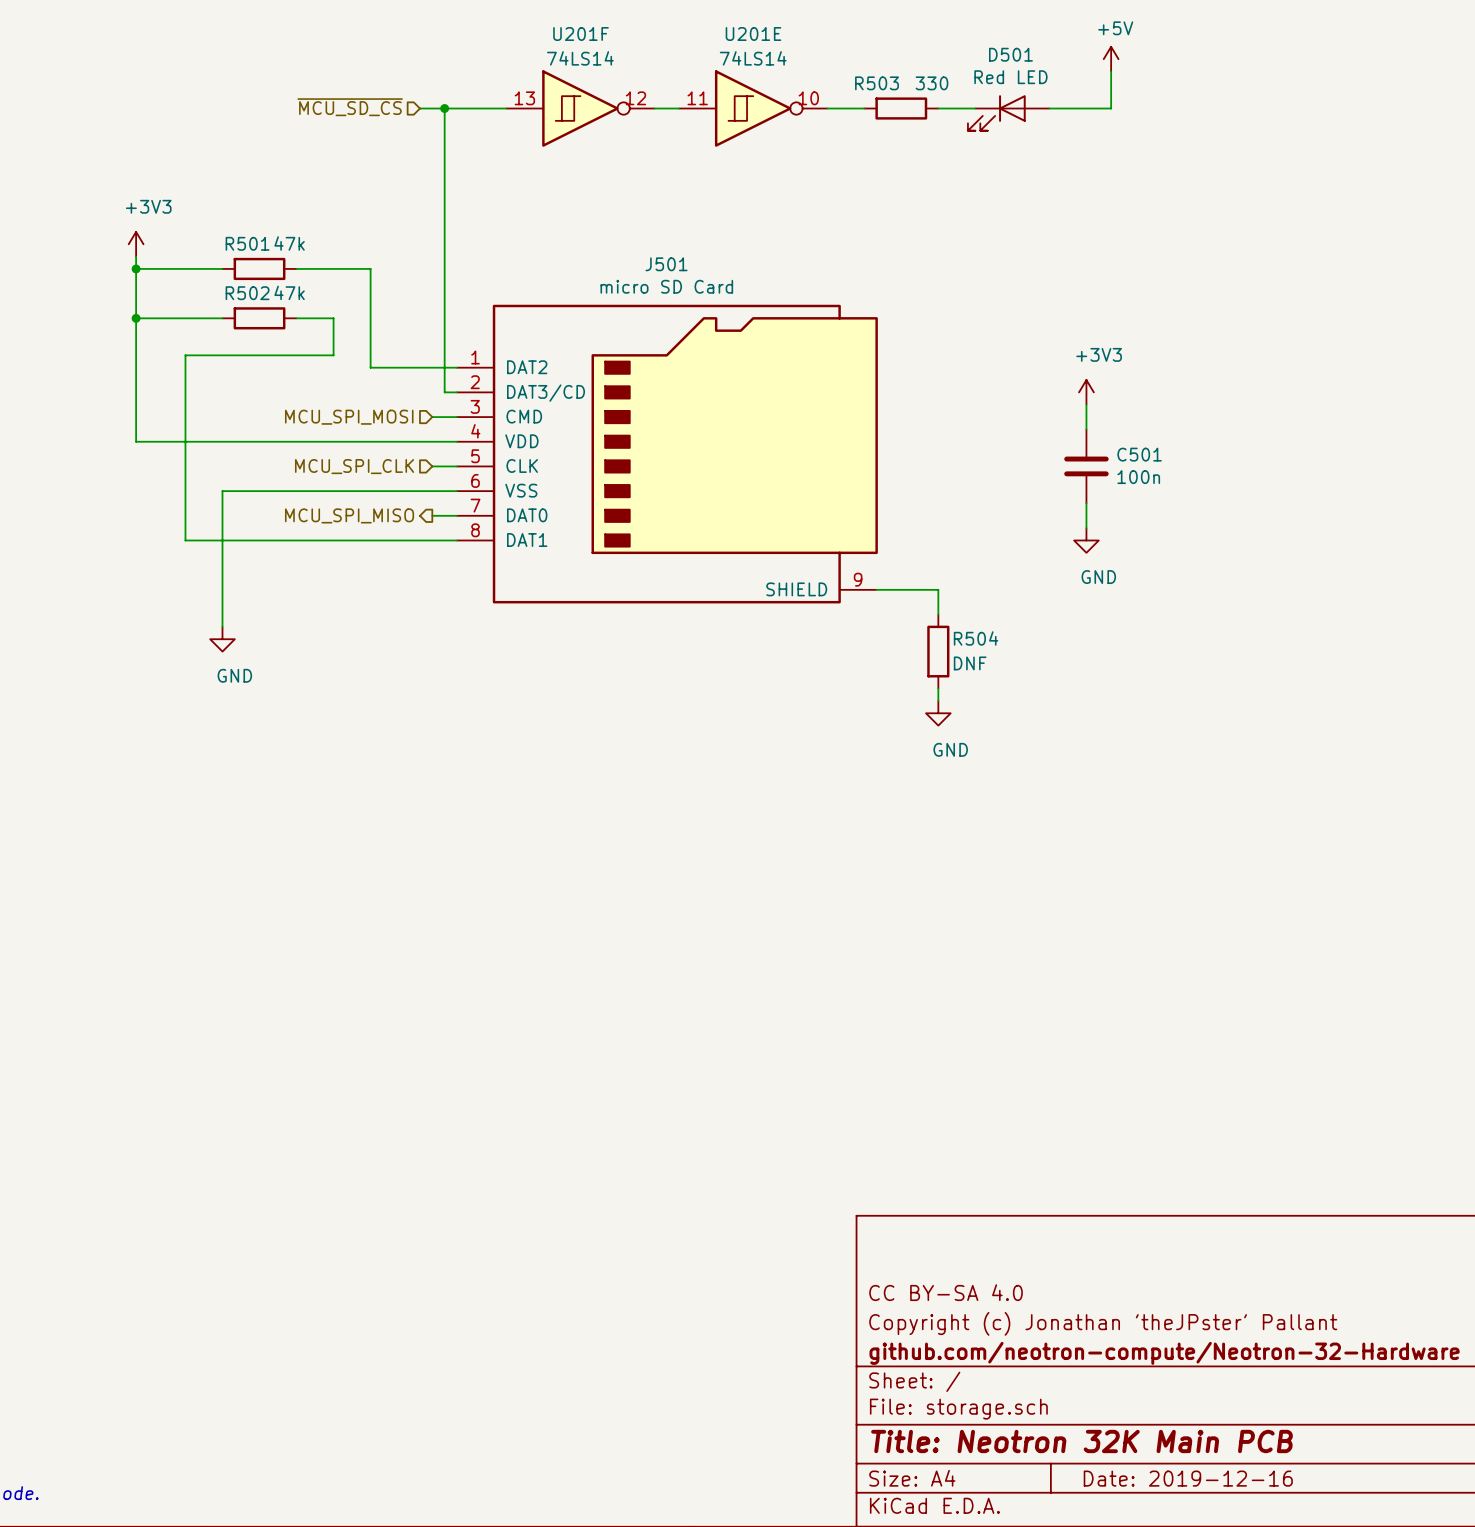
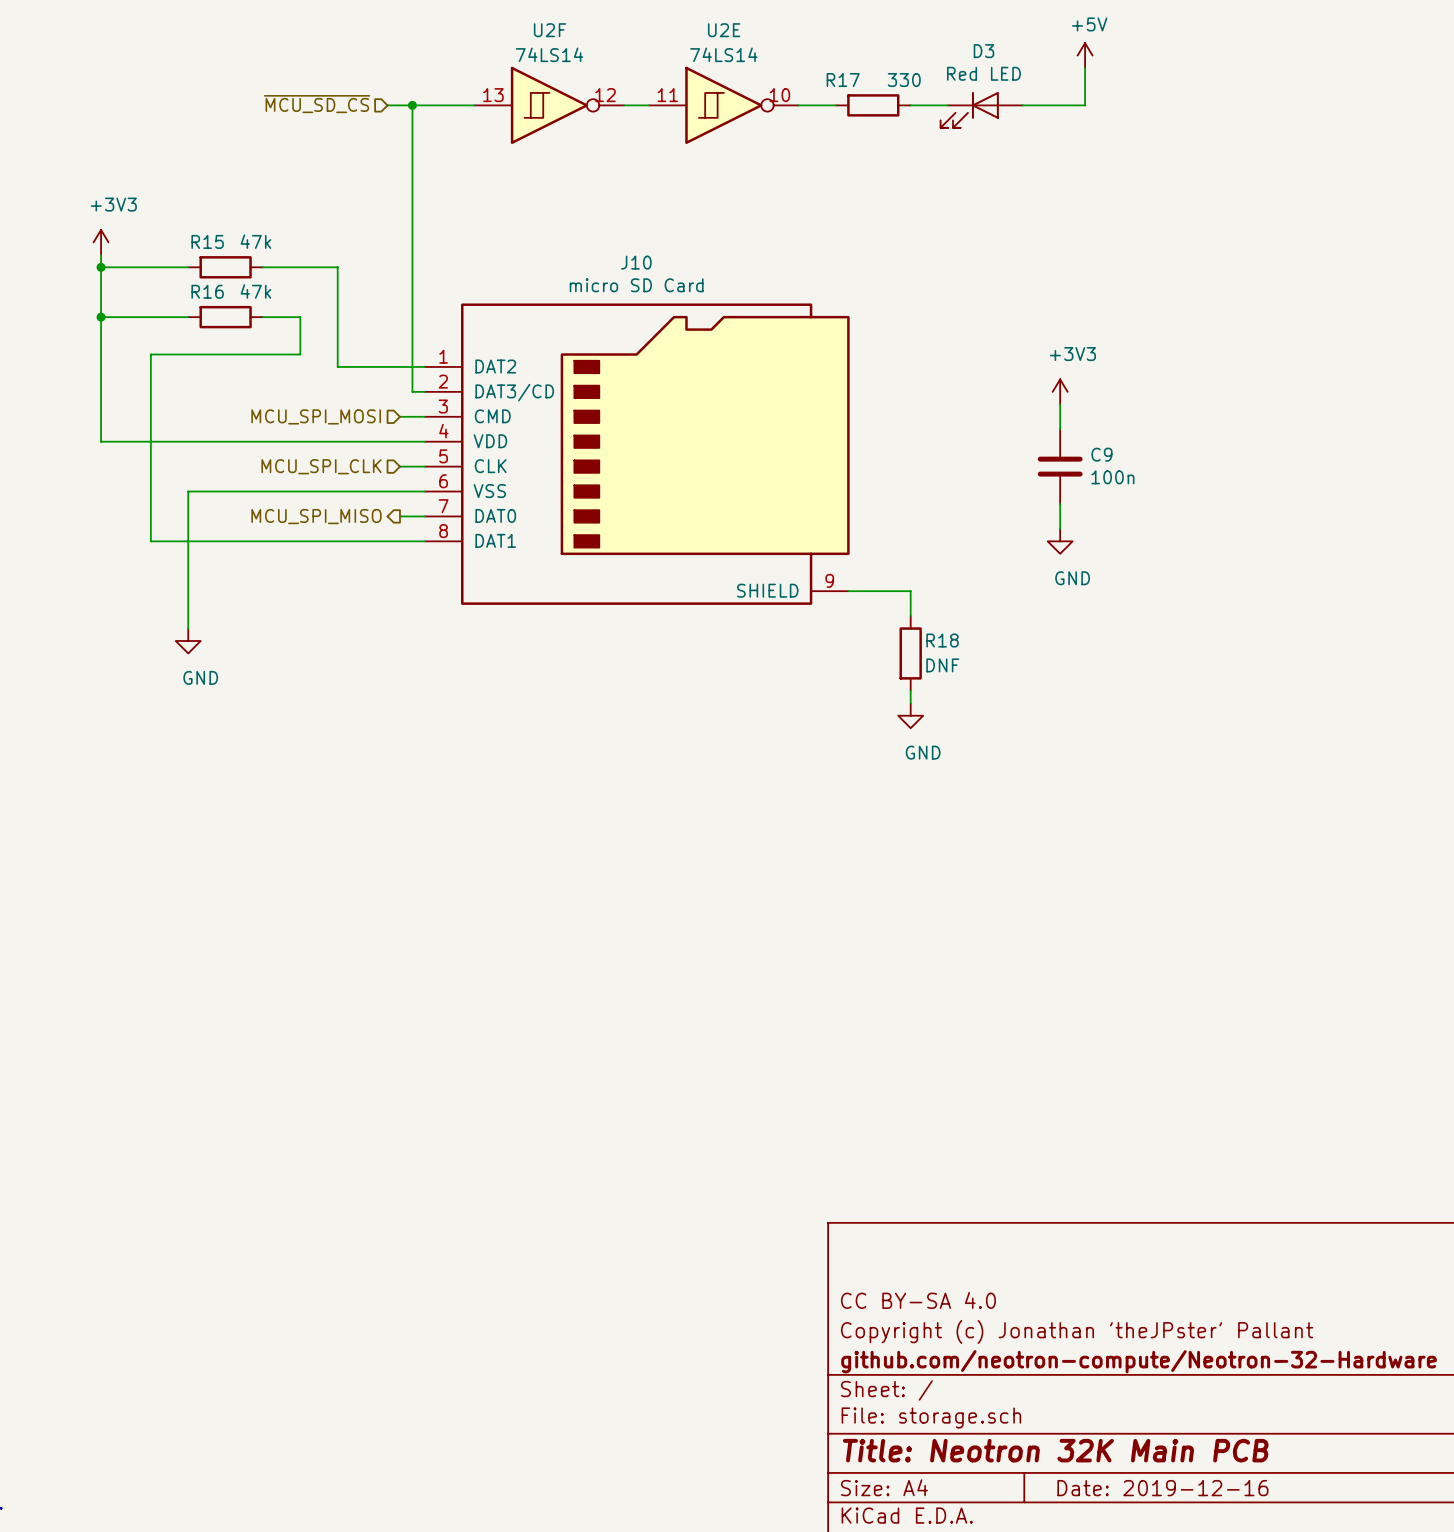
U201F name: U201F (581, 34) -> U2F (550, 30)
U201E name: U201E (753, 34) -> U2E (724, 30)
D501 name: D501 (1010, 54) -> D3 (983, 51)
R503 name: R503 (877, 83) -> R17 (843, 80)
R501 name: R501 (247, 243) -> R15 (207, 241)
J501 name: J501 (666, 264) -> J10 (636, 262)
R502 name: R502 (247, 293) -> R16 (207, 291)
C501 name: C501 (1139, 454) -> C9 (1101, 454)
R504 name: R504 (976, 638) -> R18 (942, 640)

